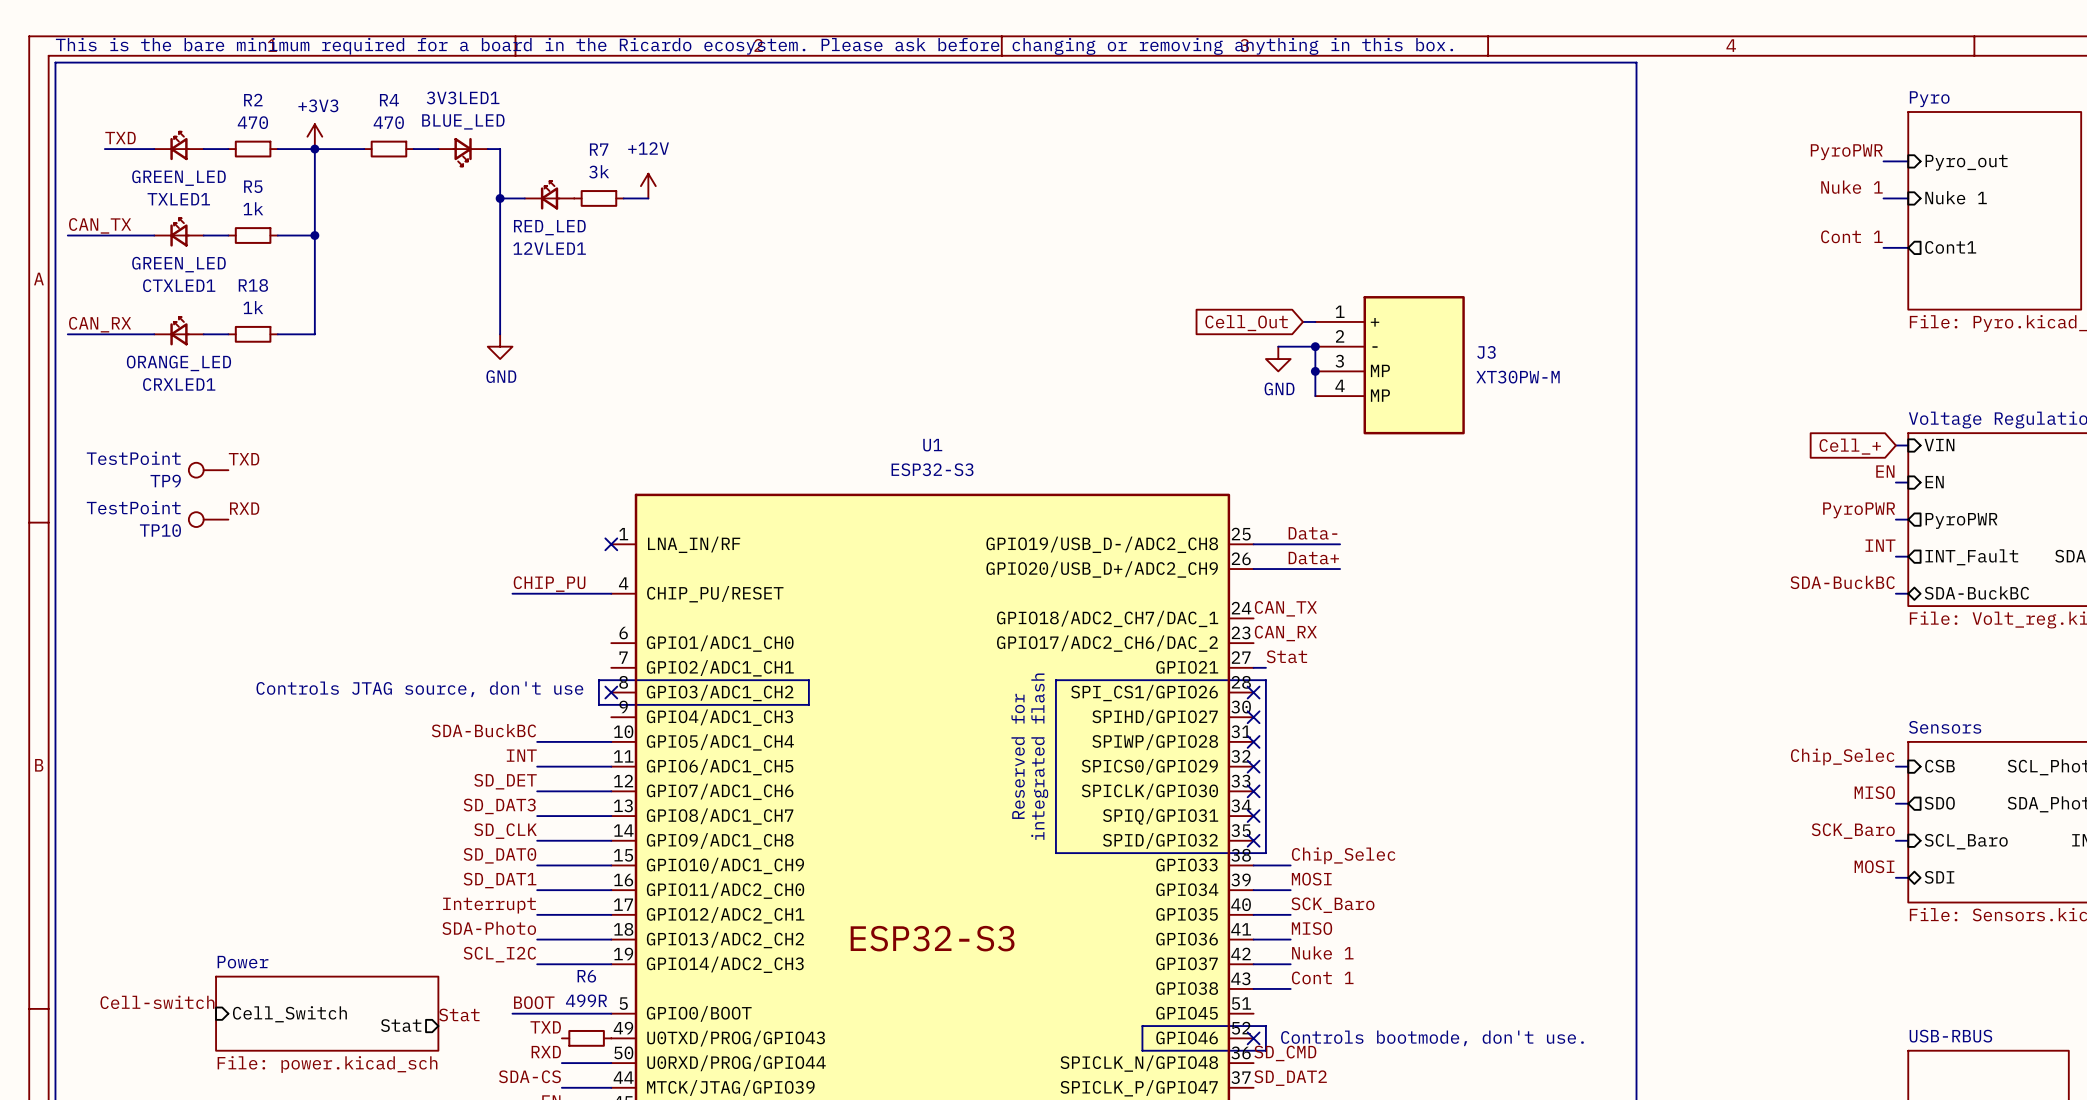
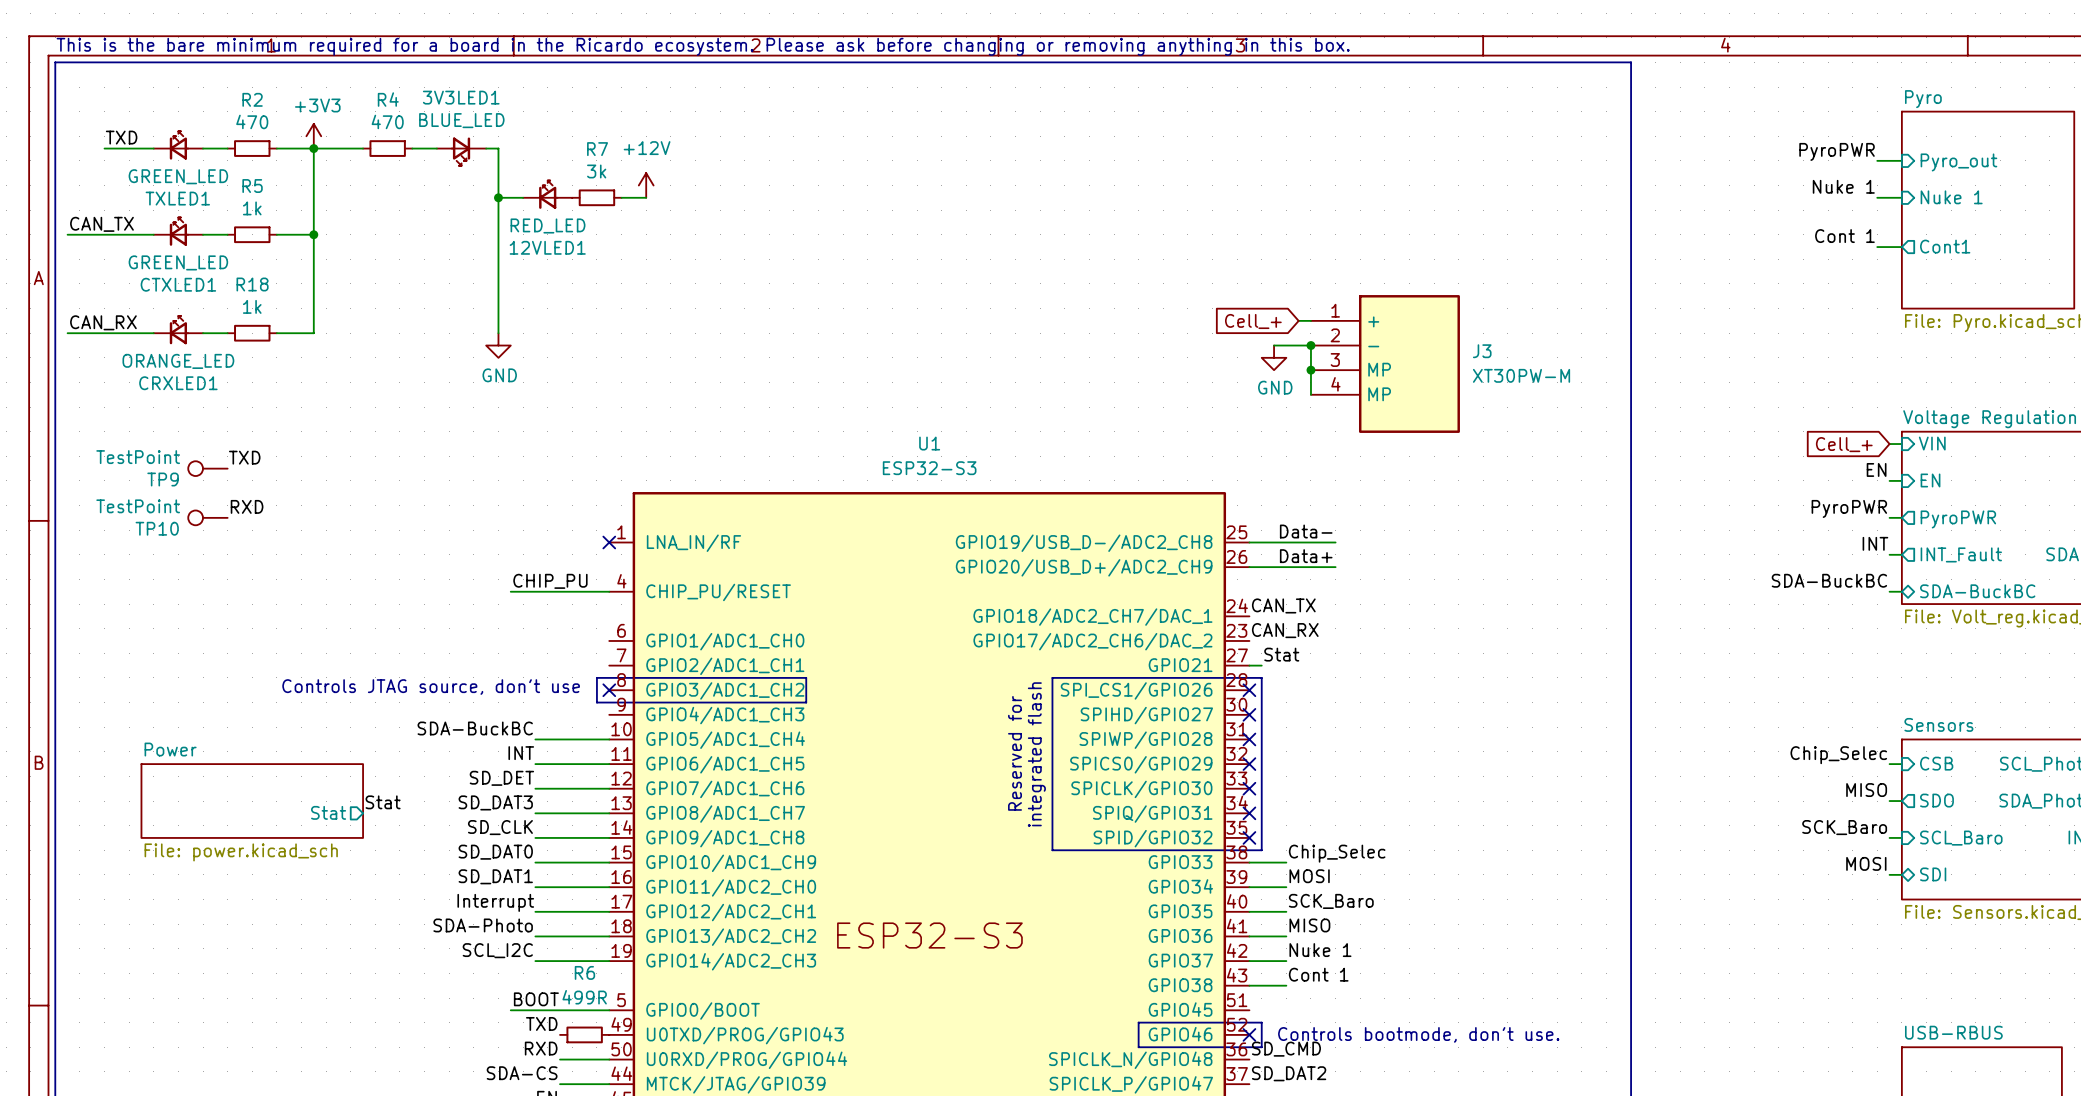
global label: Cell_Out (1246, 323) -> Cell_+ (1253, 321)
label: Cell-switch (157, 1002) -> none
sheet Power position: (327, 1013) -> (252, 801)
sheet pin: Cell_Switch (289, 1014) -> none
label position: Stat (459, 1015) -> Stat (383, 802)
sheet pin position: Stat (401, 1025) -> Stat (328, 812)

